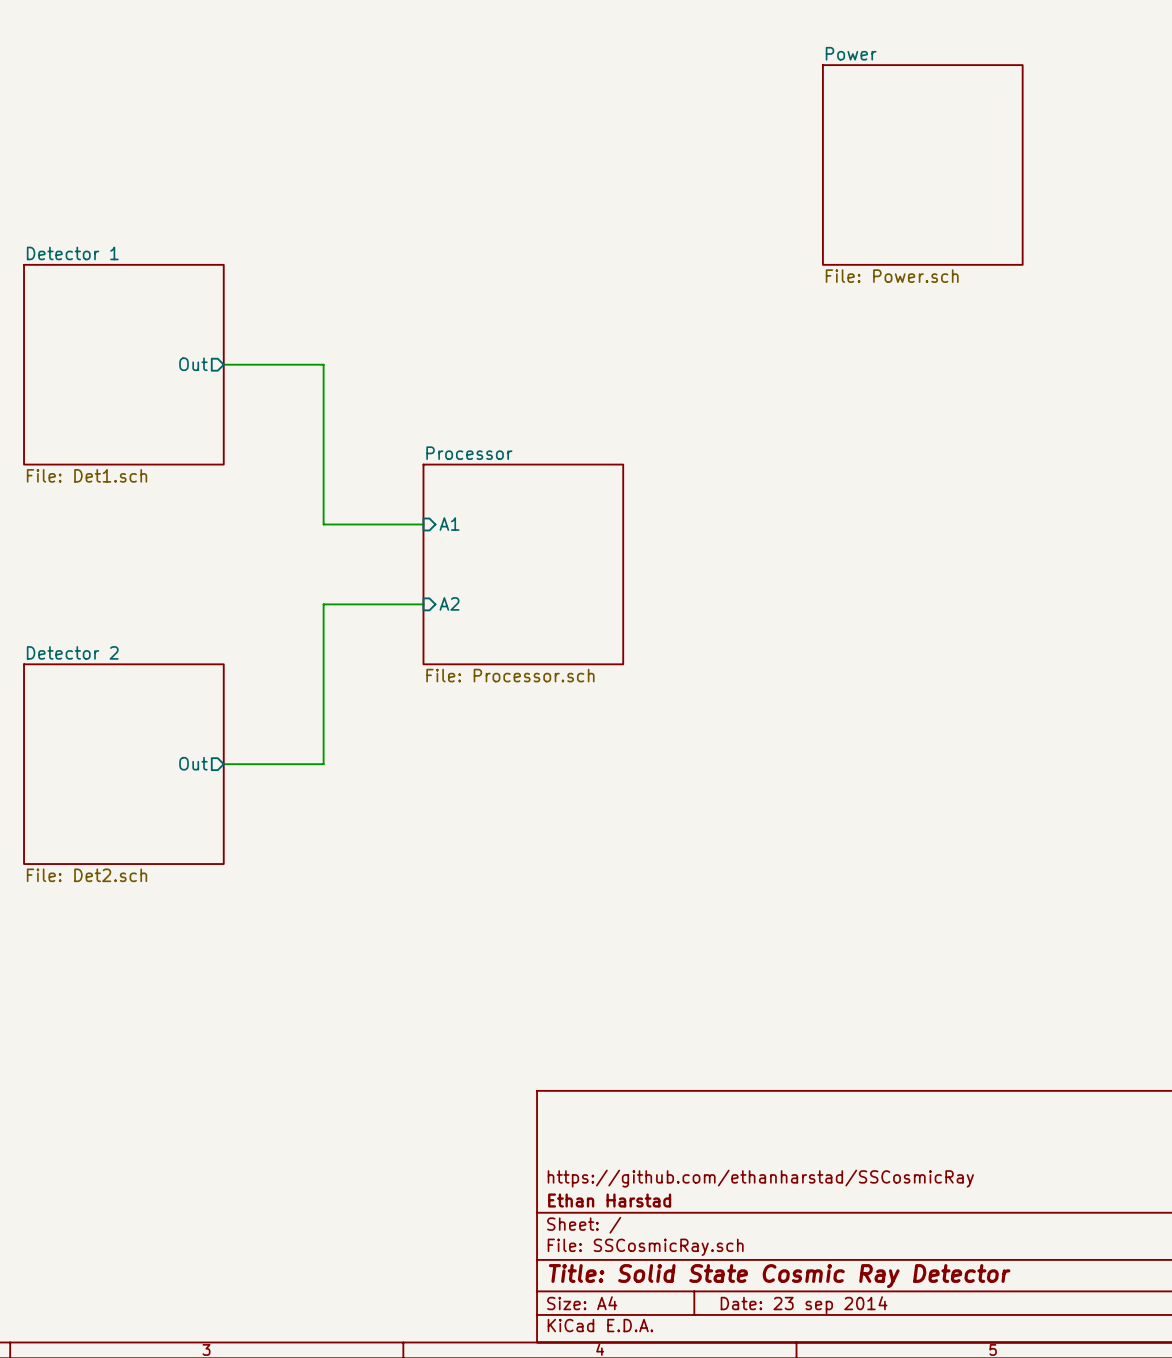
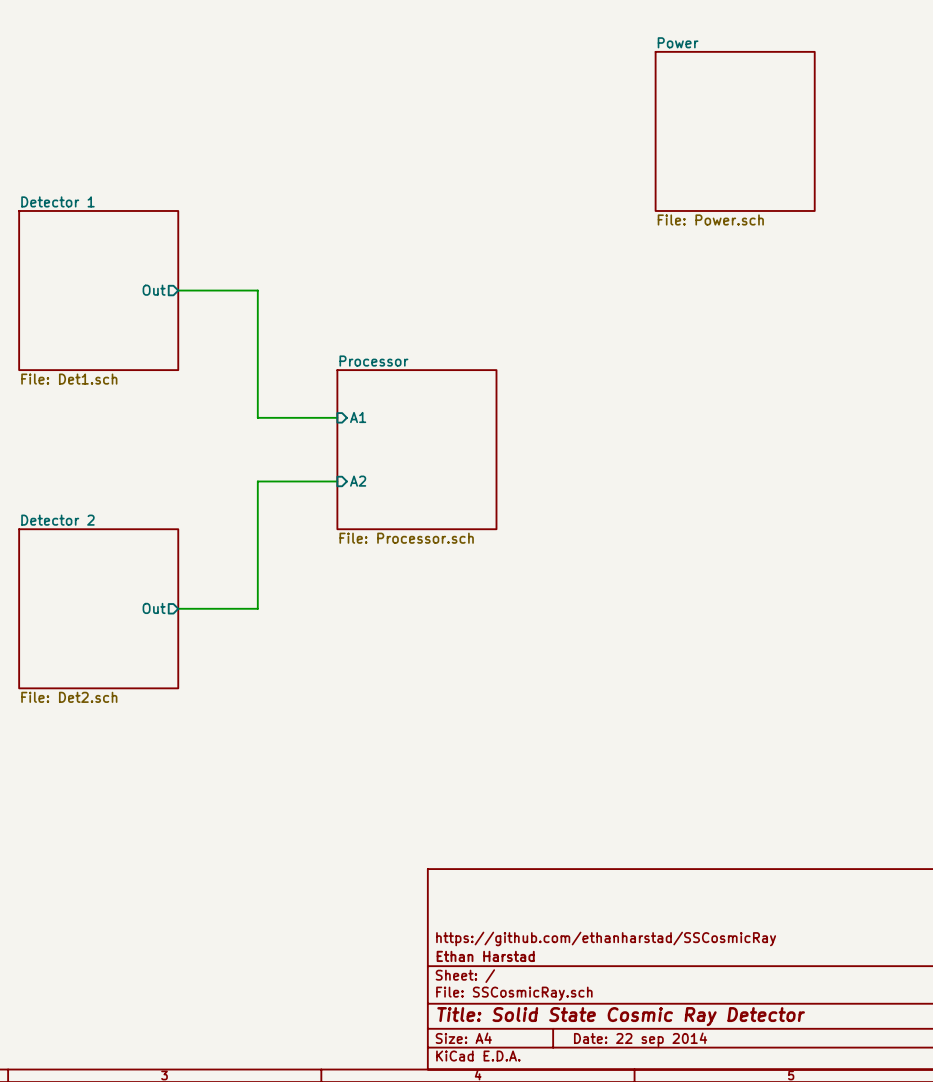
title block: Date: 23 sep 2014 (804, 1305) -> Date: 22 sep 2014 (640, 1039)

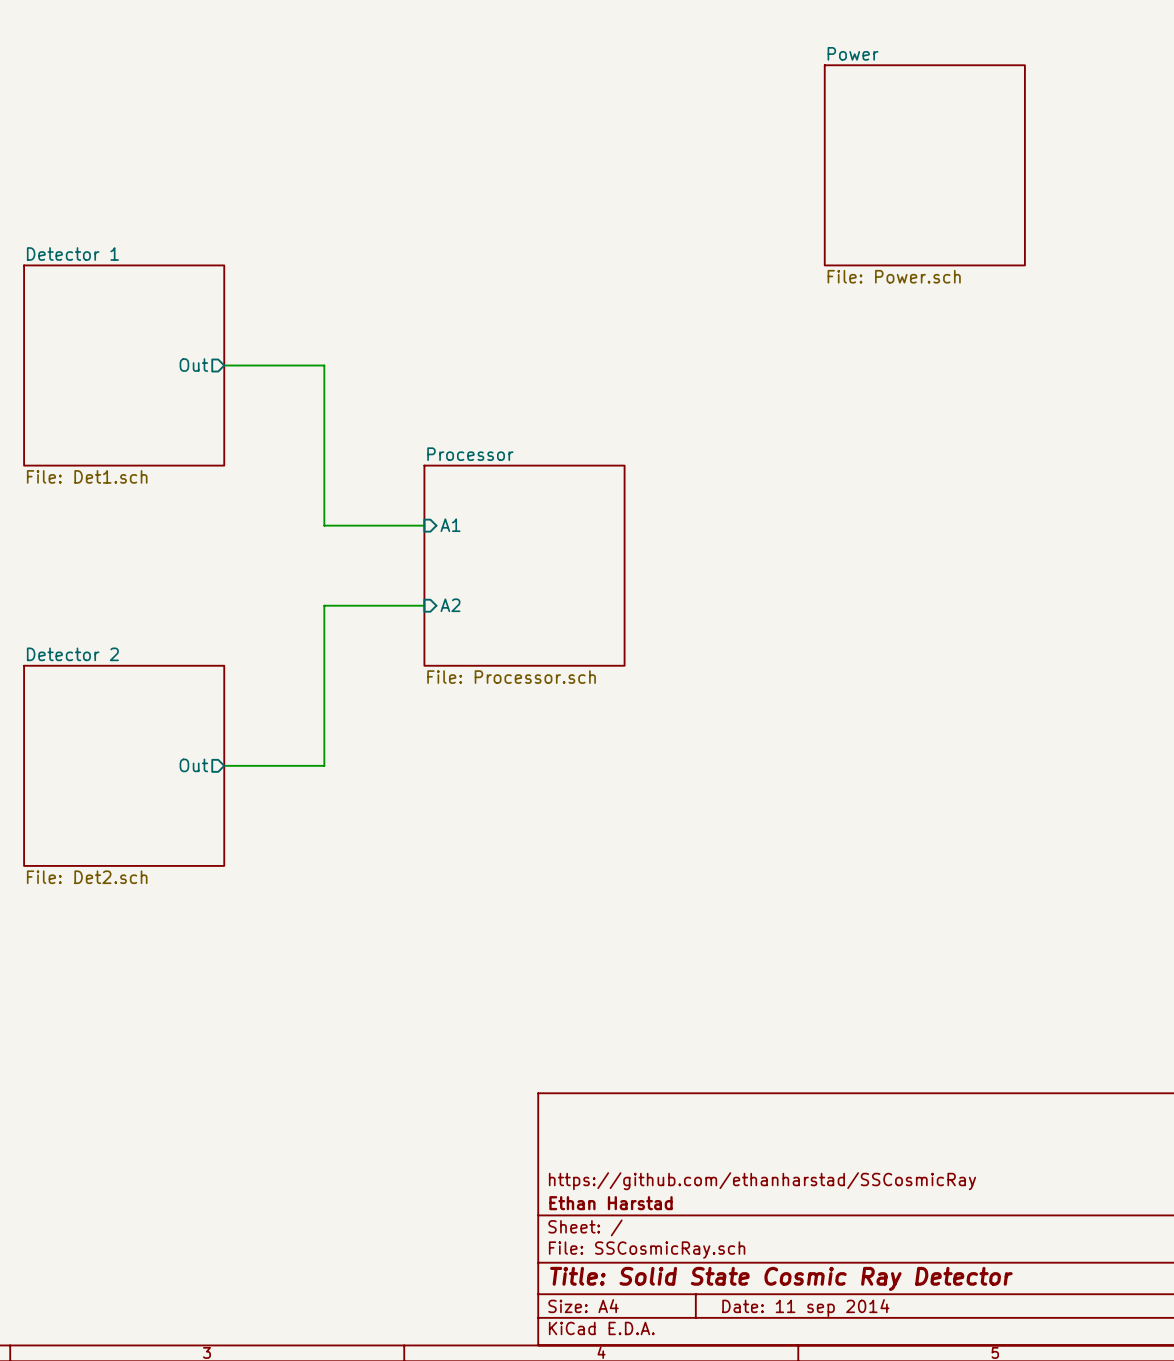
title block: Date: 22 sep 2014 (640, 1039) -> Date: 11 sep 2014 (805, 1308)

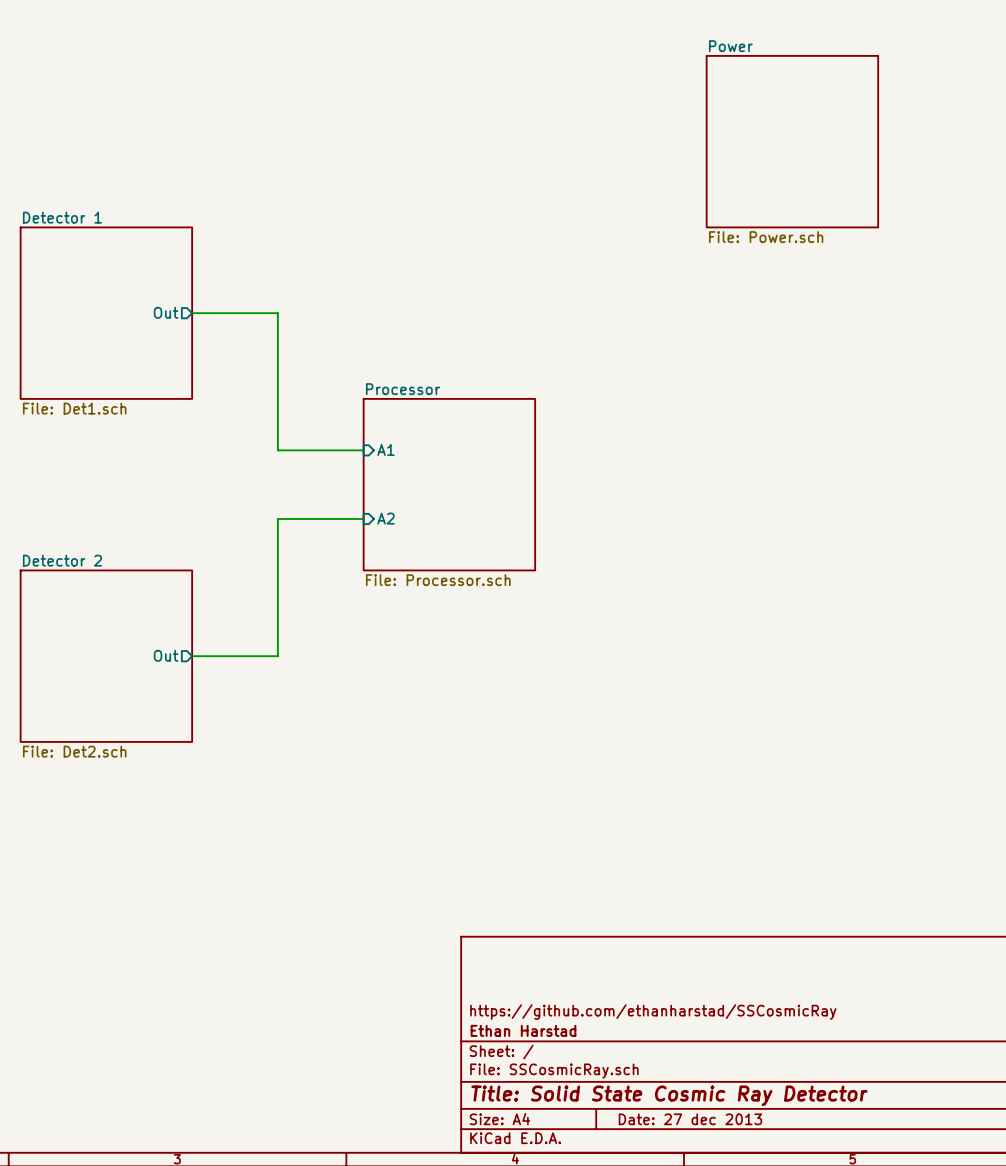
title block: Date: 11 sep 2014 (805, 1308) -> Date: 27 dec 2013 (690, 1119)

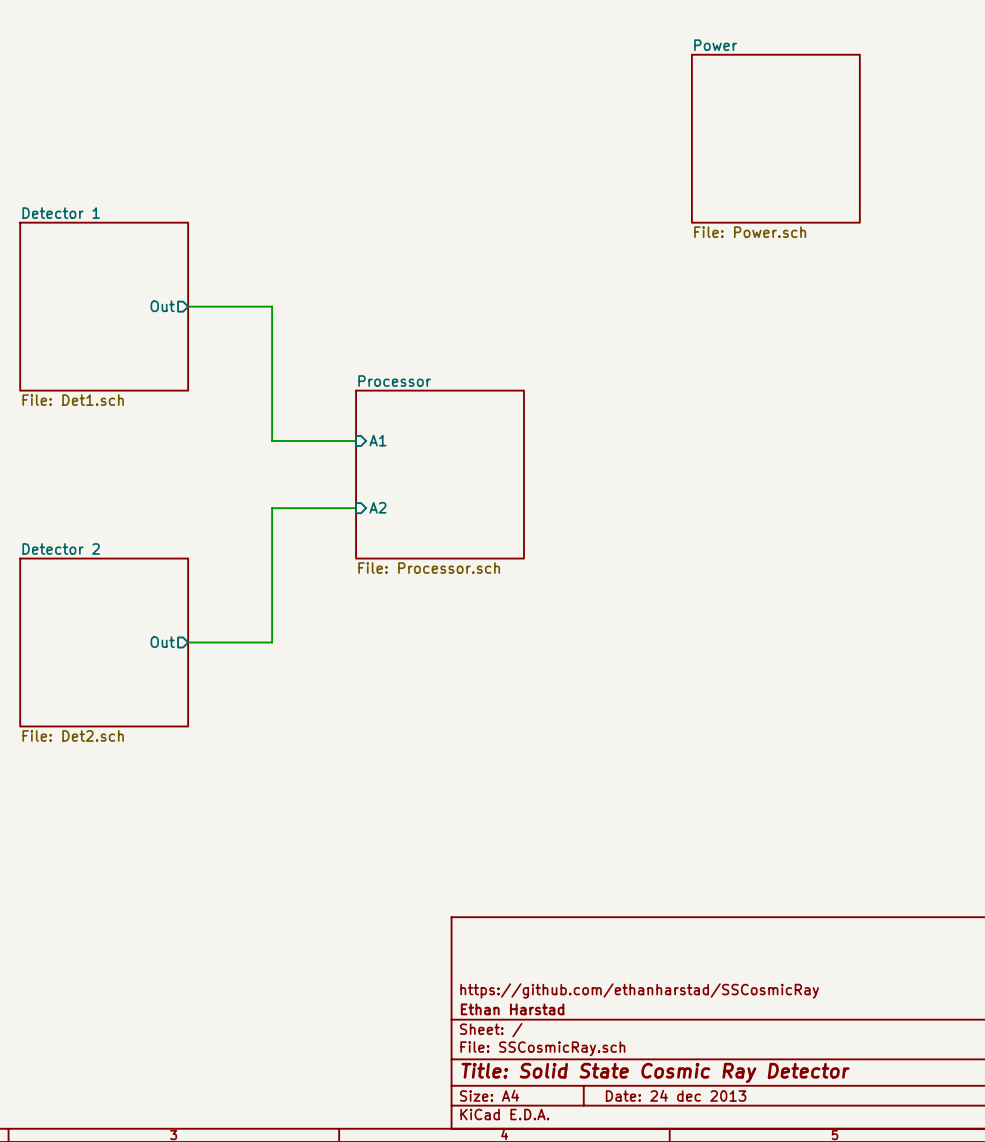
title block: Date: 27 dec 2013 (690, 1119) -> Date: 24 dec 2013 (676, 1095)

